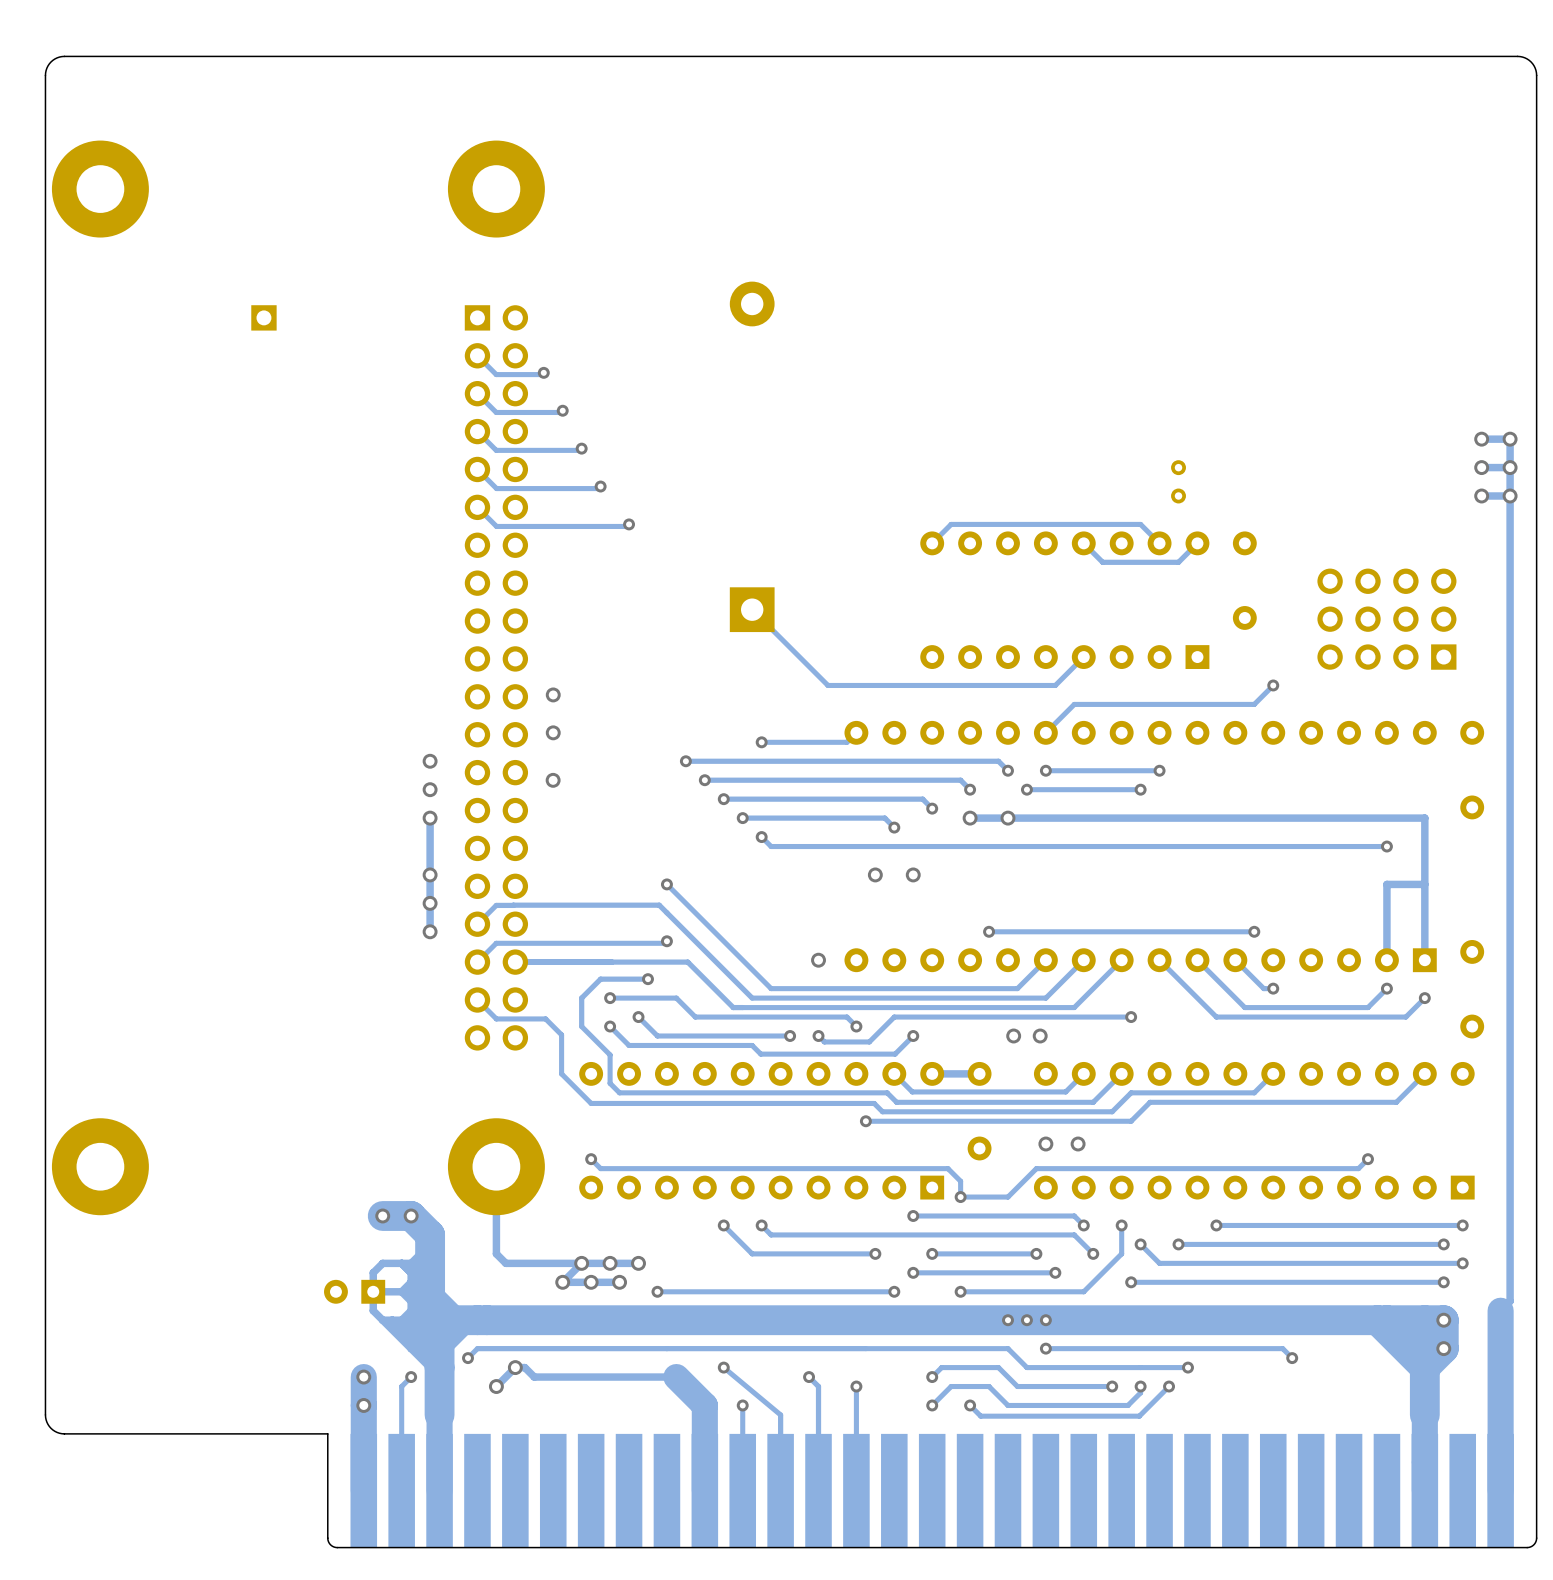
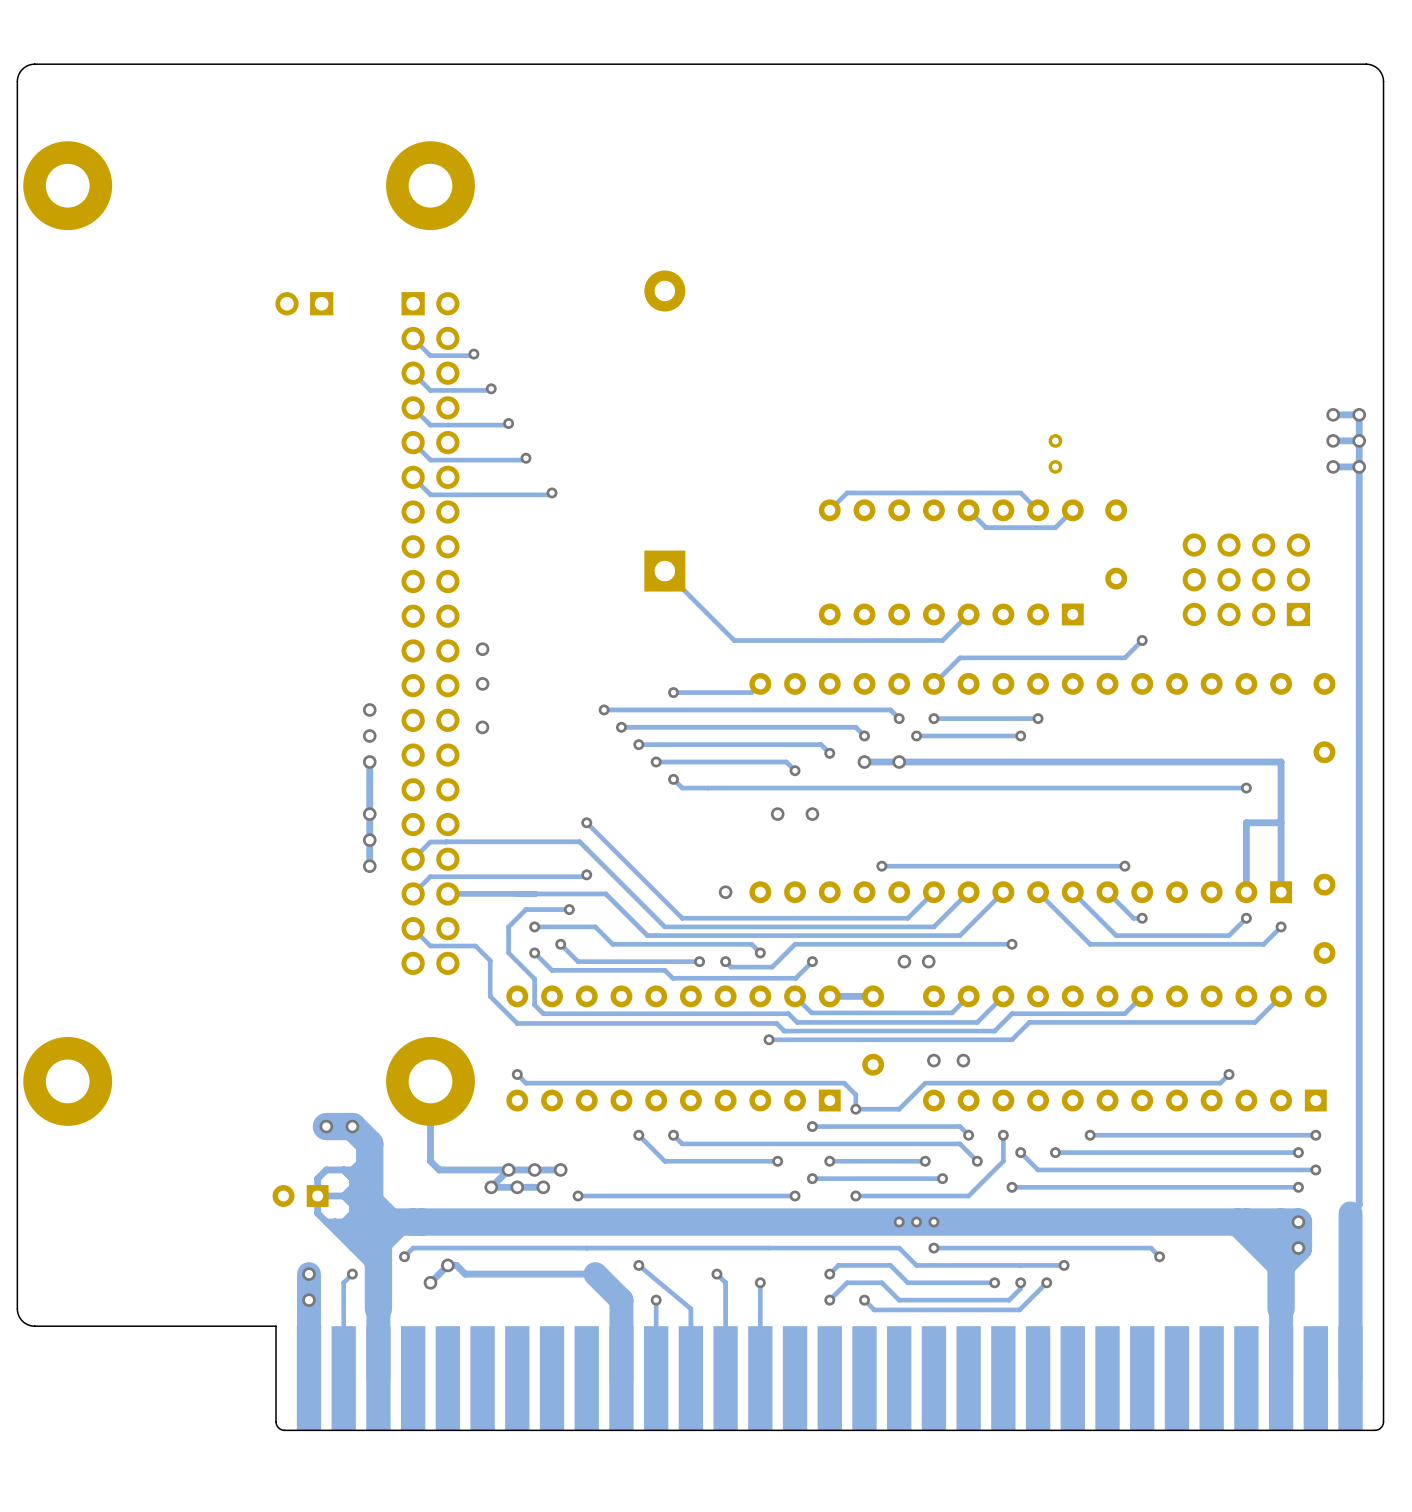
part: (263, 317) -> none
part: none -> (304, 303)

